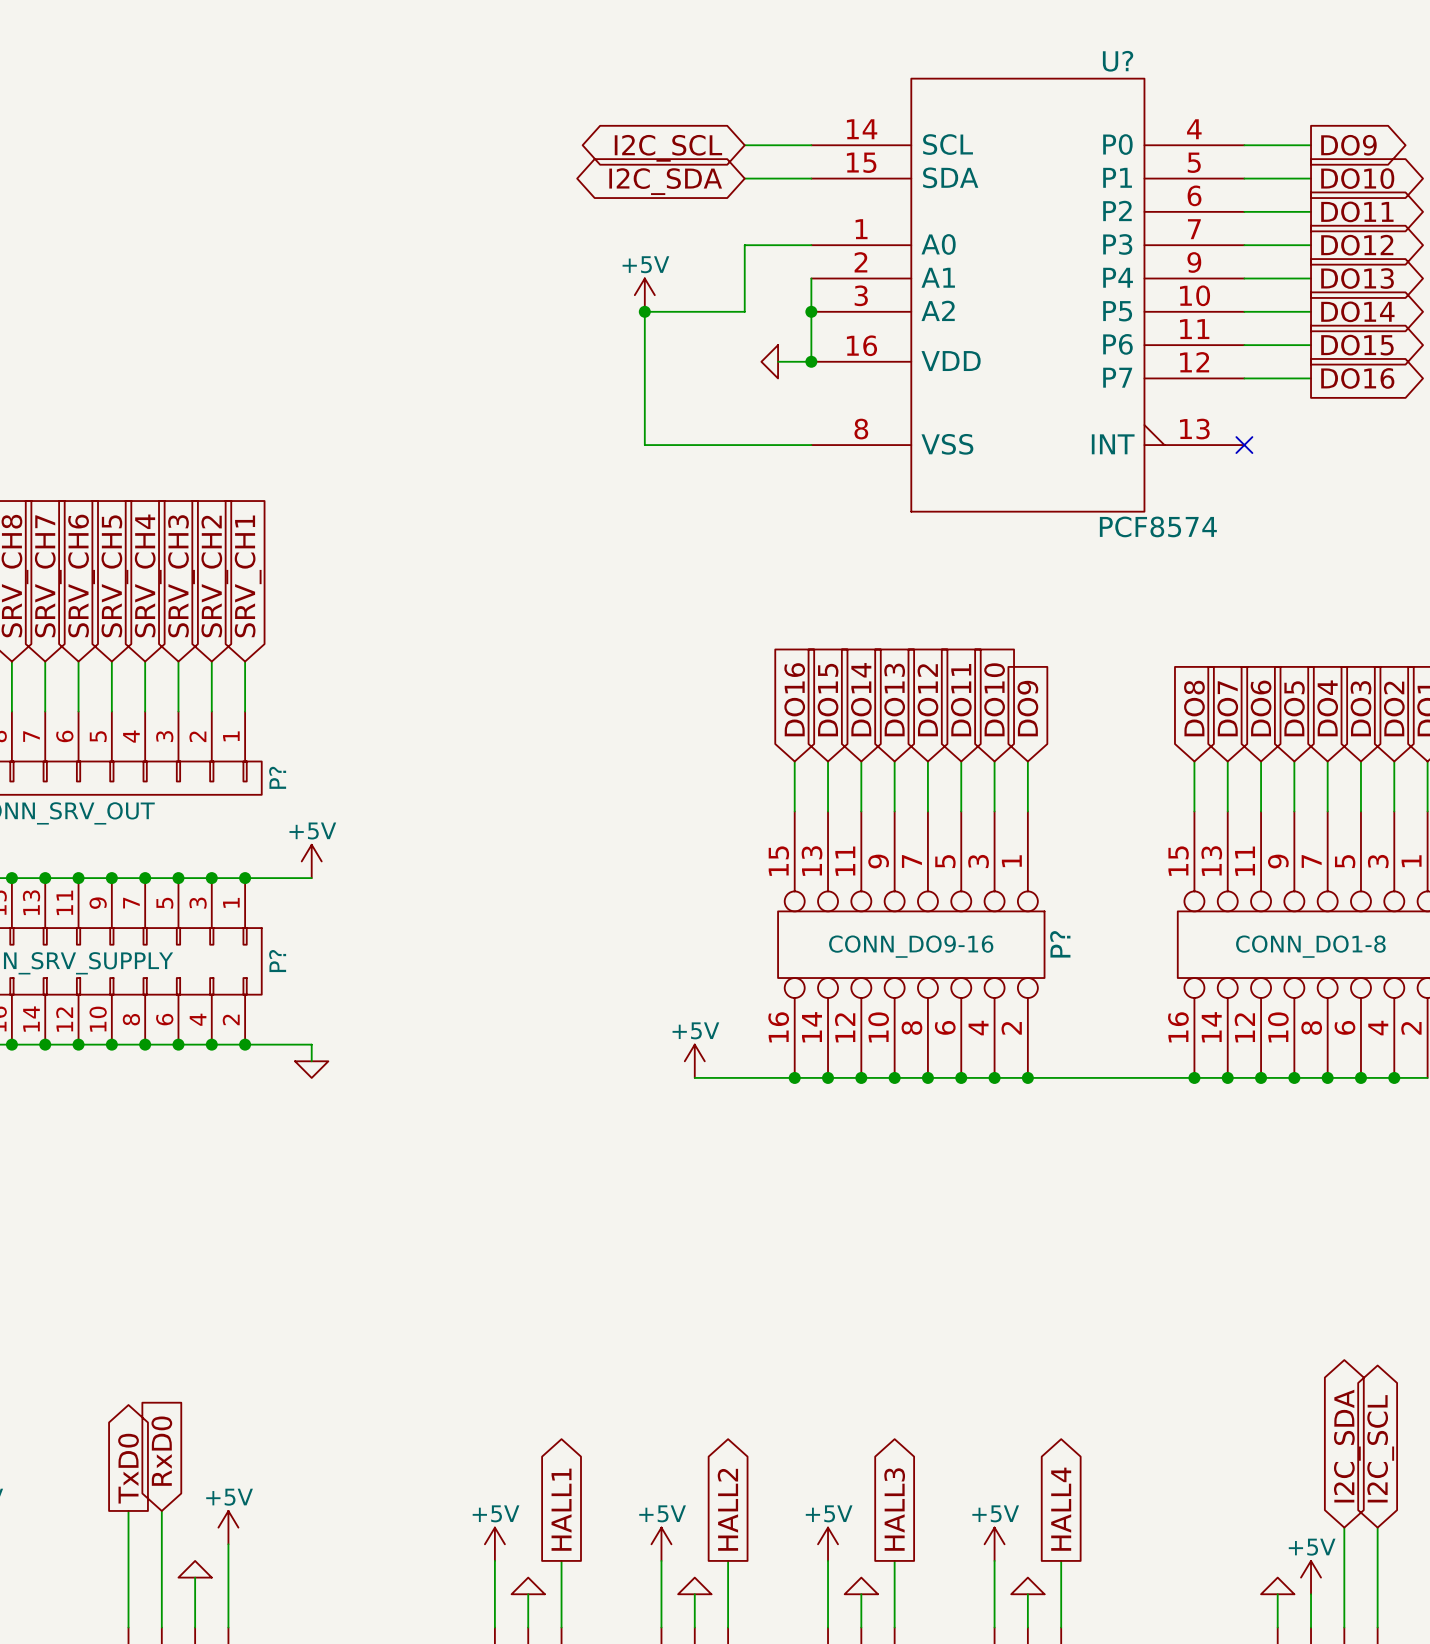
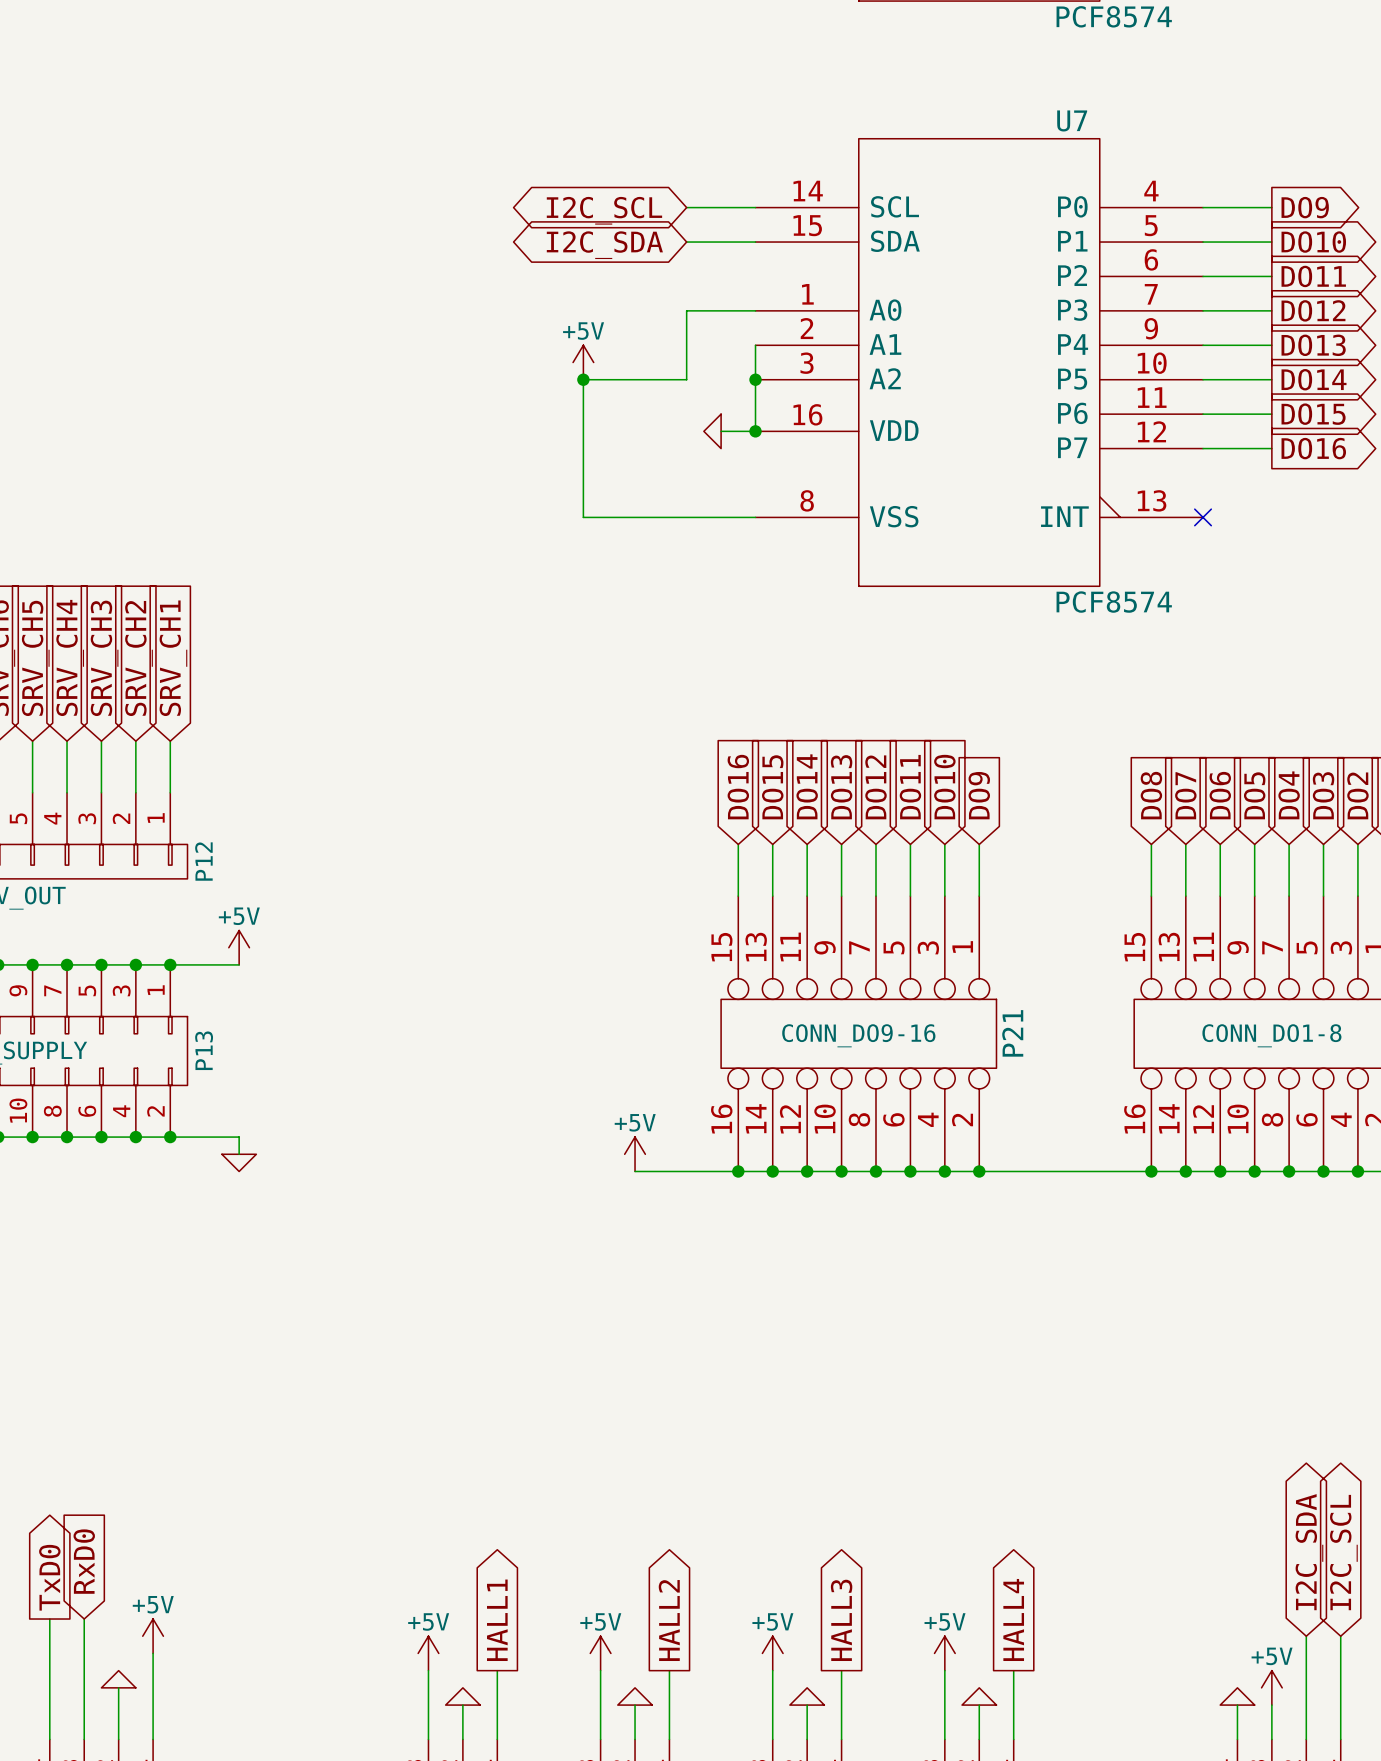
U? name: U? (1118, 61) -> U7 (1072, 120)
P? name: P? (277, 777) -> P12 (203, 861)
P? name: P? (1060, 944) -> P21 (1012, 1033)
P? name: P? (277, 961) -> P13 (204, 1050)

